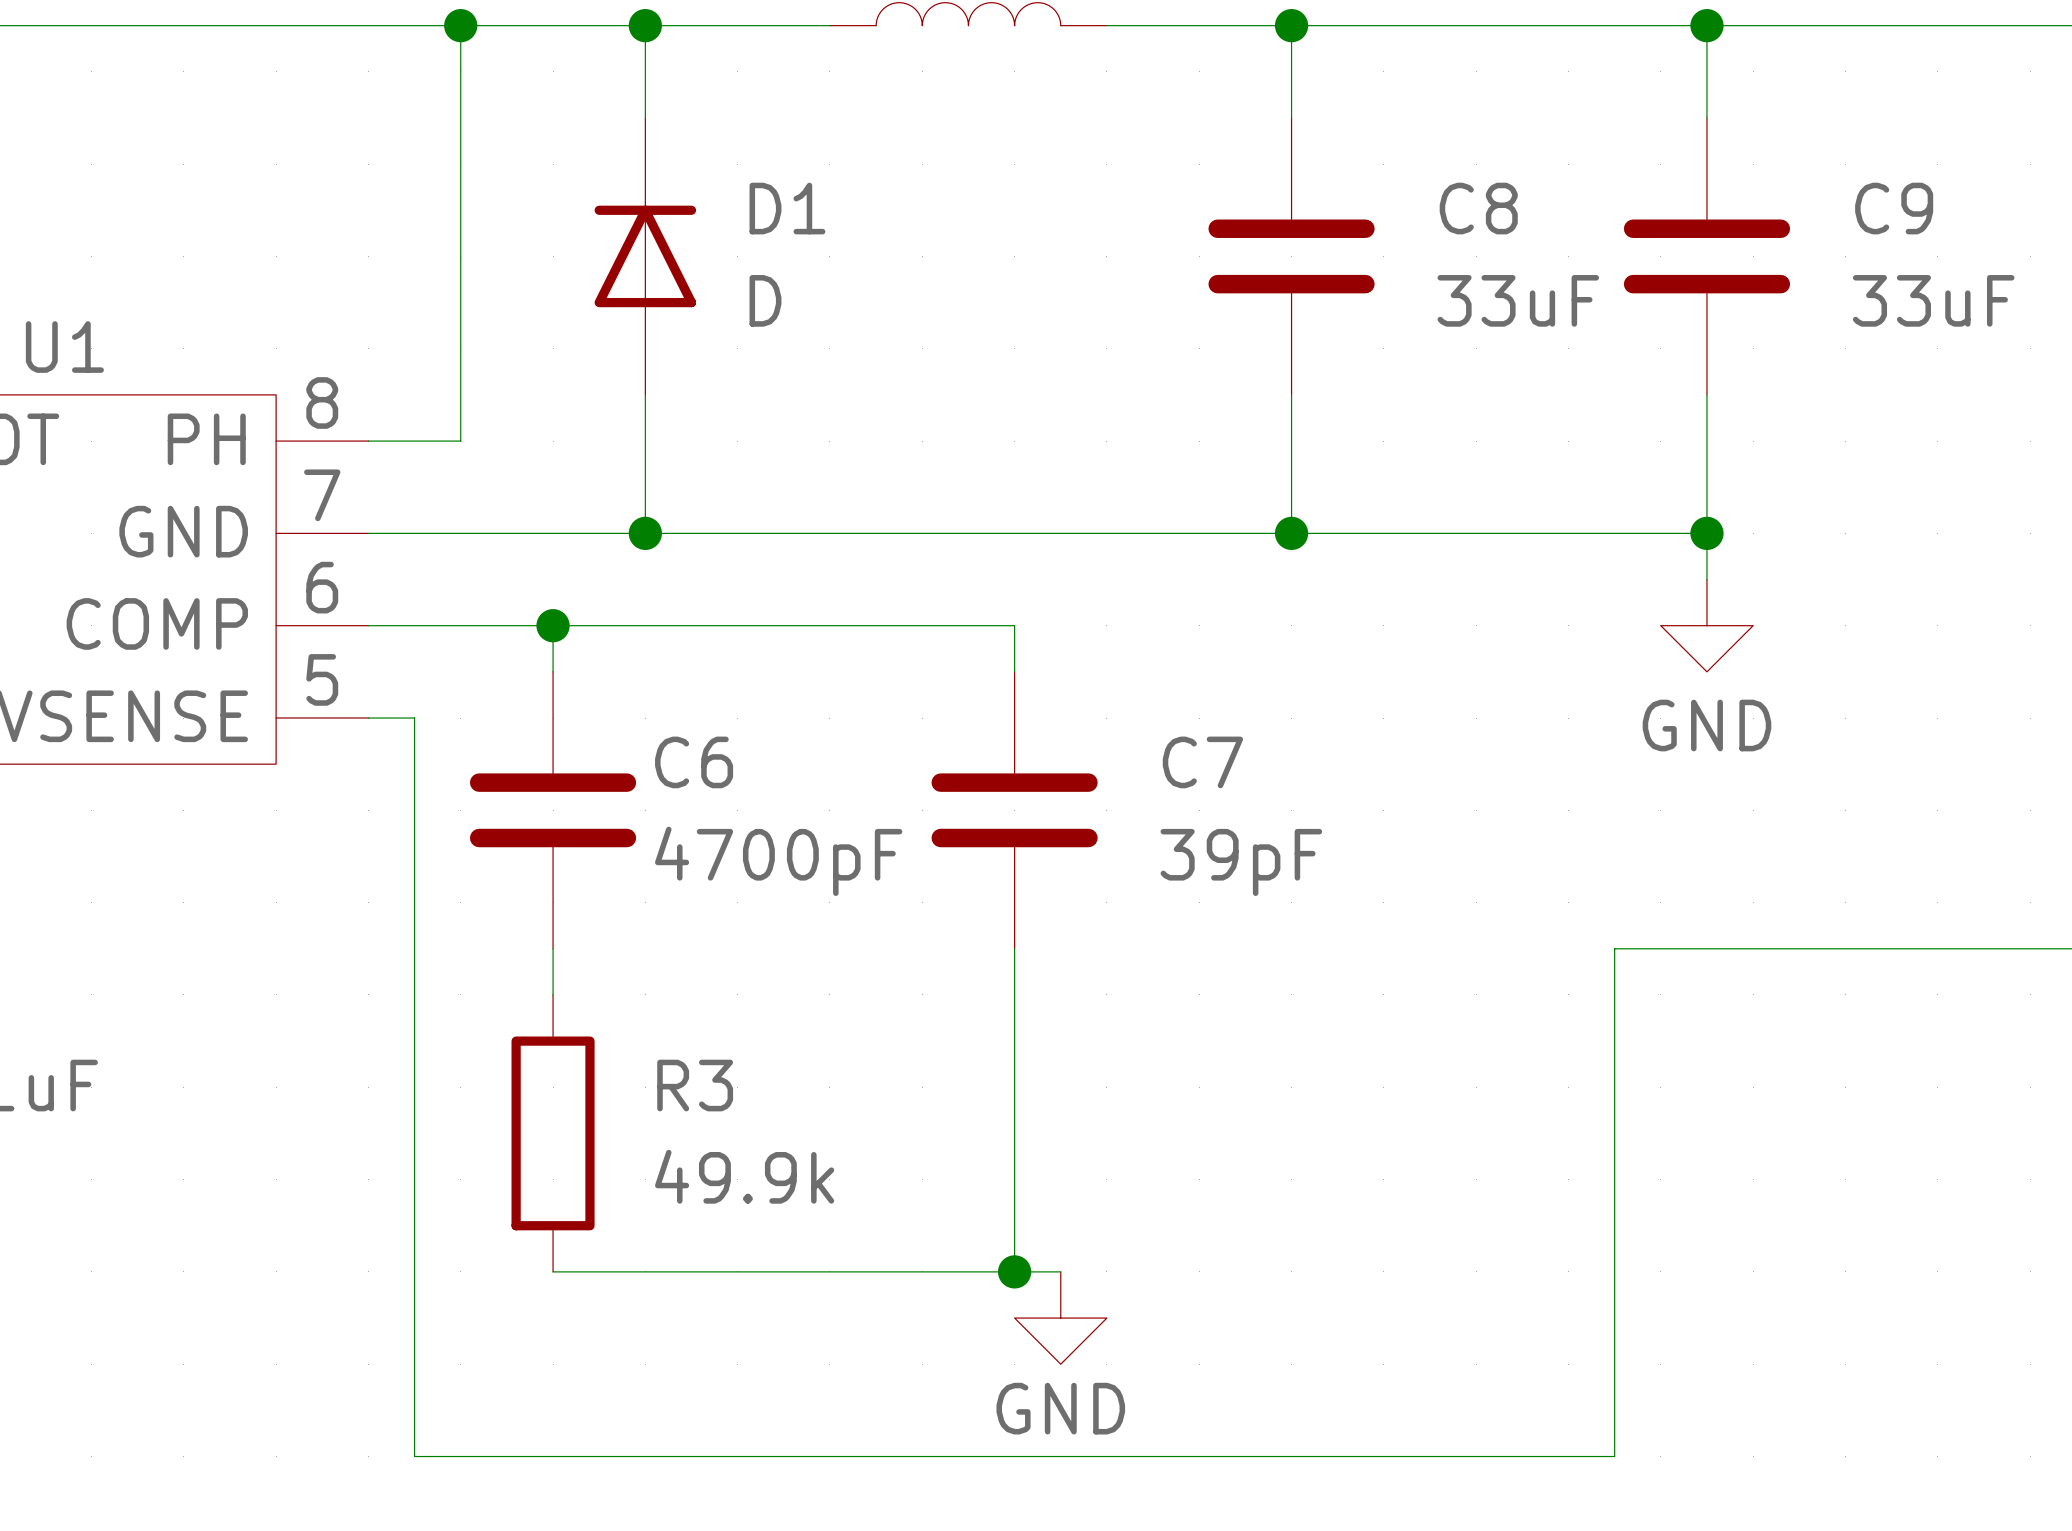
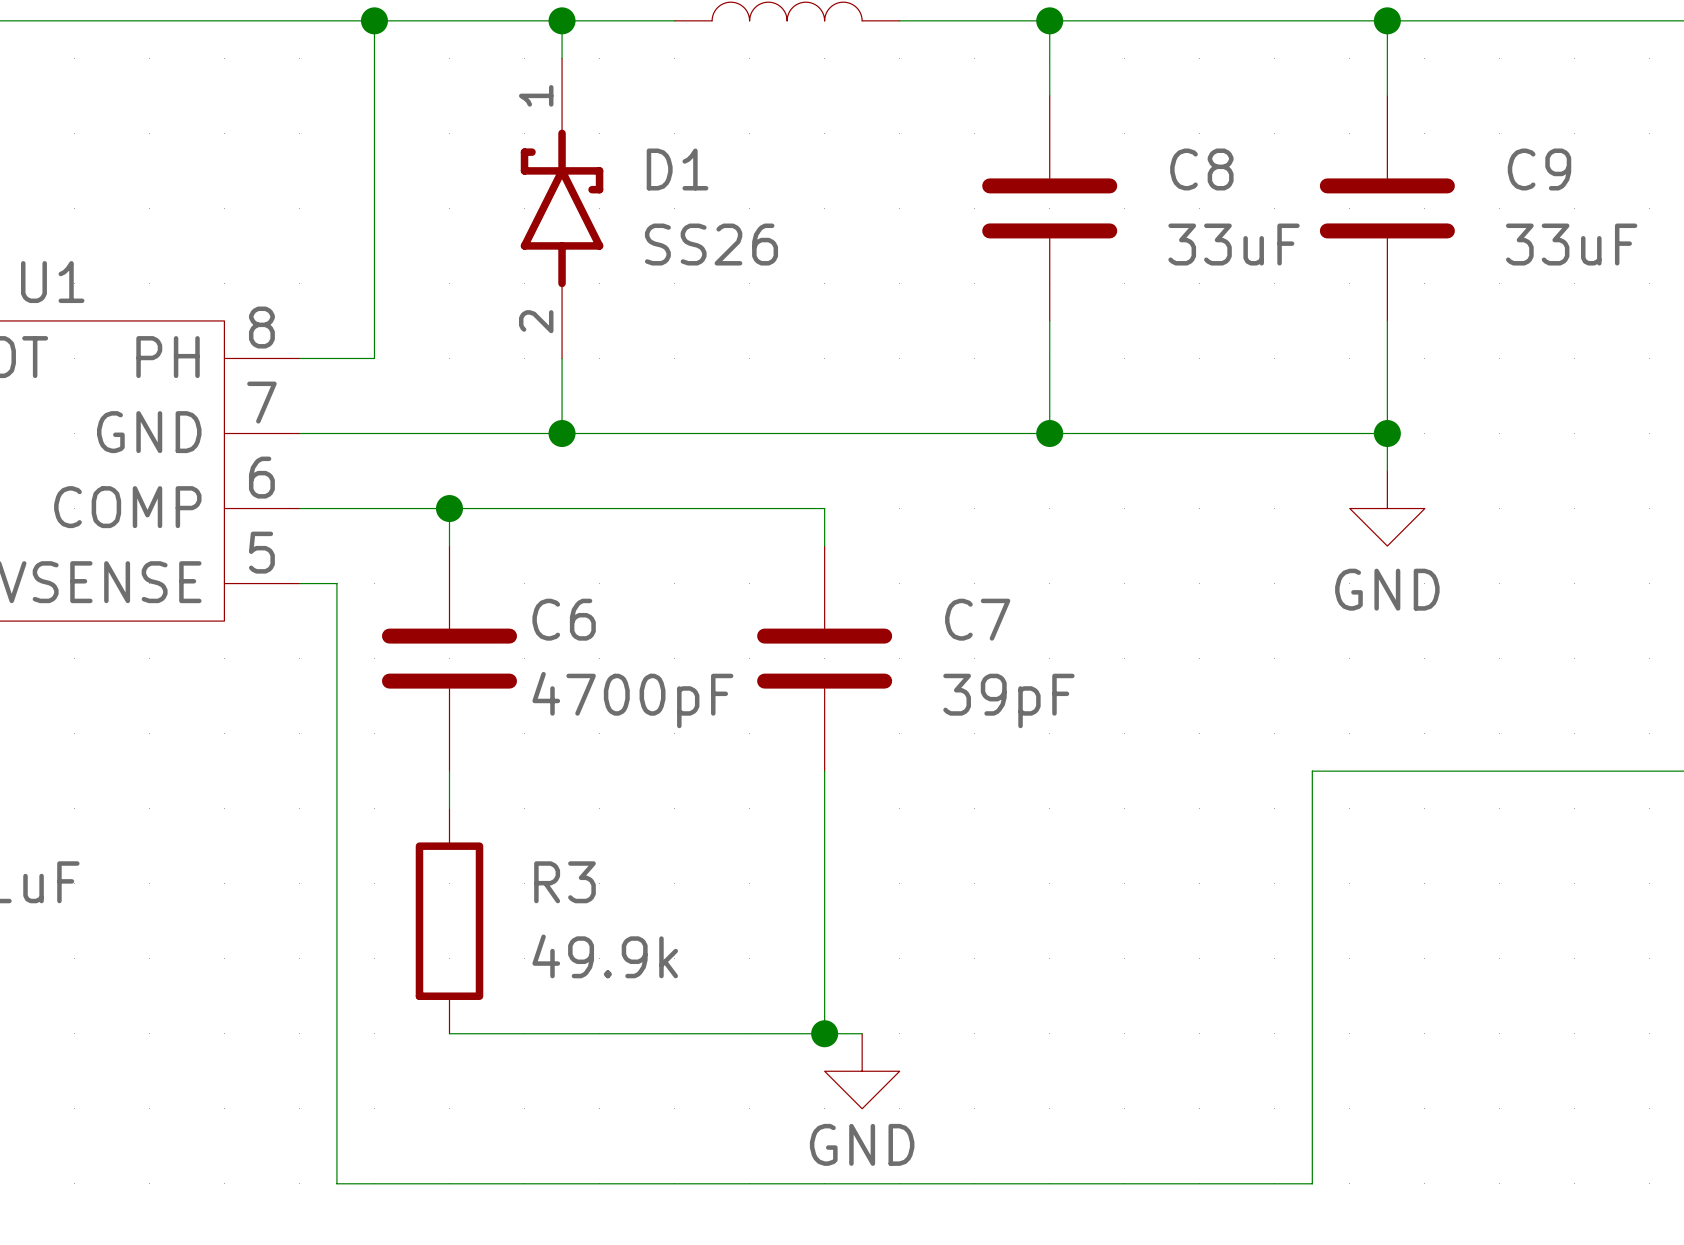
wire: (645, 25) (645, 117) -> (562, 358) (562, 433)
junction position: (645, 25) -> (562, 20)
wire: none -> (562, 20) (562, 58)
D1 symbol: [594, 117, 697, 395] -> [520, 58, 604, 359]
D1 value: D (765, 300) -> SS26 (711, 244)
wire: (645, 394) (645, 533) -> none
junction position: (645, 533) -> (562, 433)

